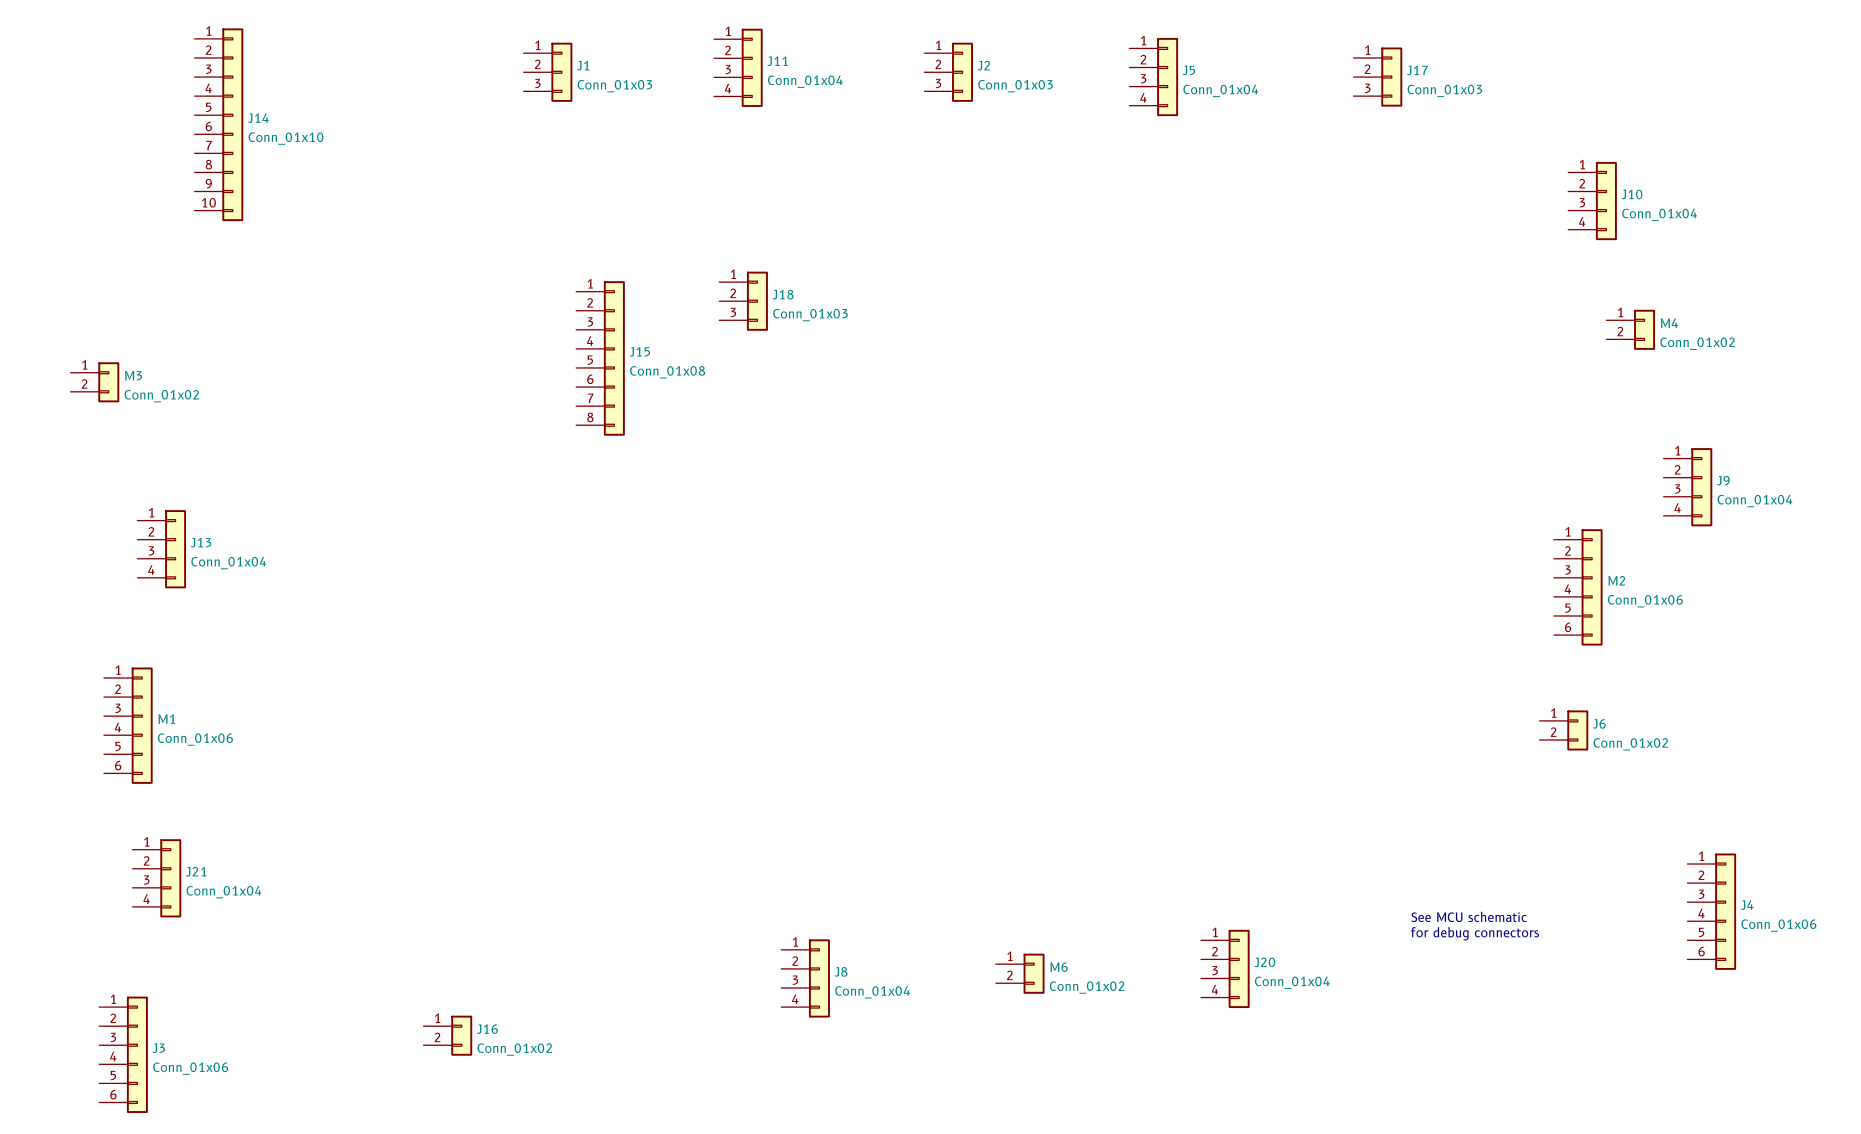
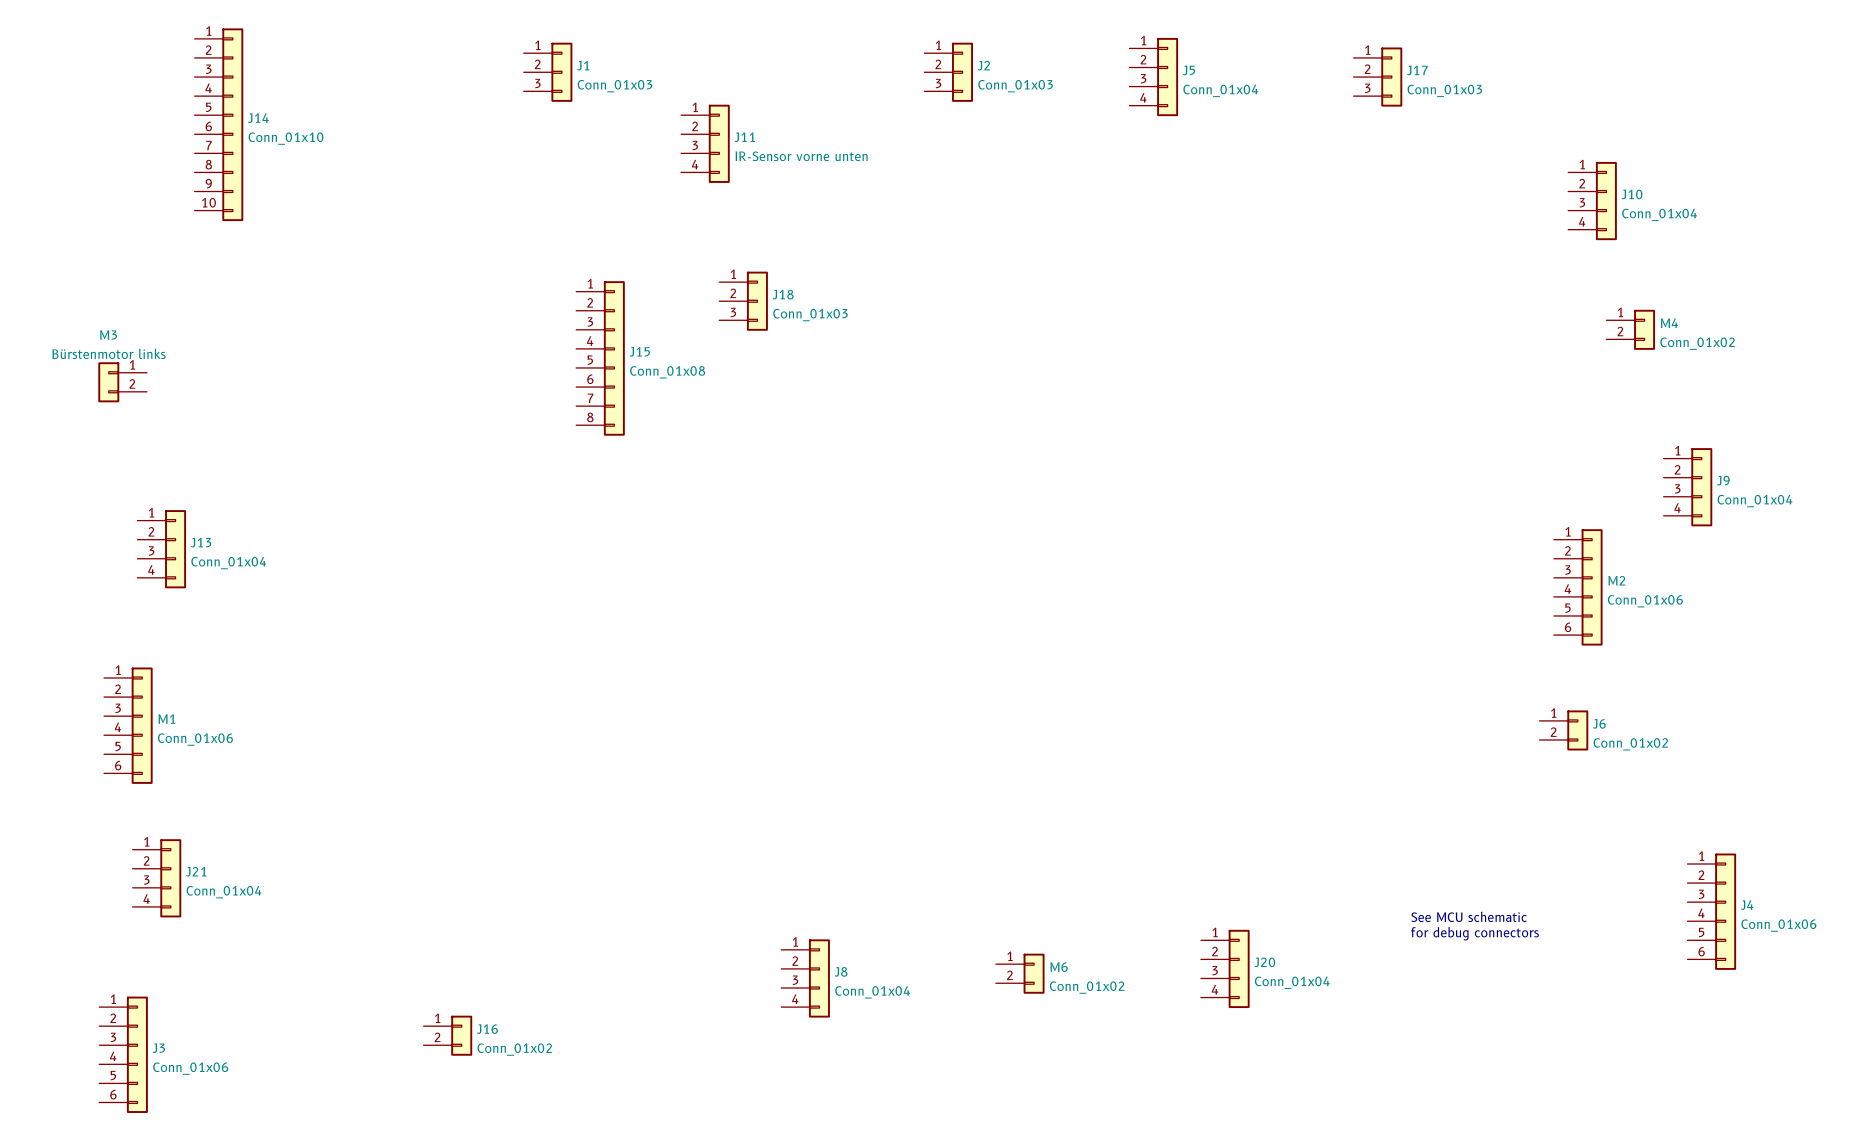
J11 position: (738, 67) -> (705, 143)
J11 value: Conn_01x04 (805, 81) -> IR-Sensor vorne unten (801, 156)
M3 name position: M3 (133, 375) -> M3 (108, 335)
M3 flip: as is (108, 382) -> left-right (108, 382)
M3 value: Conn_01x02 (161, 396) -> Bürstenmotor links (108, 353)

